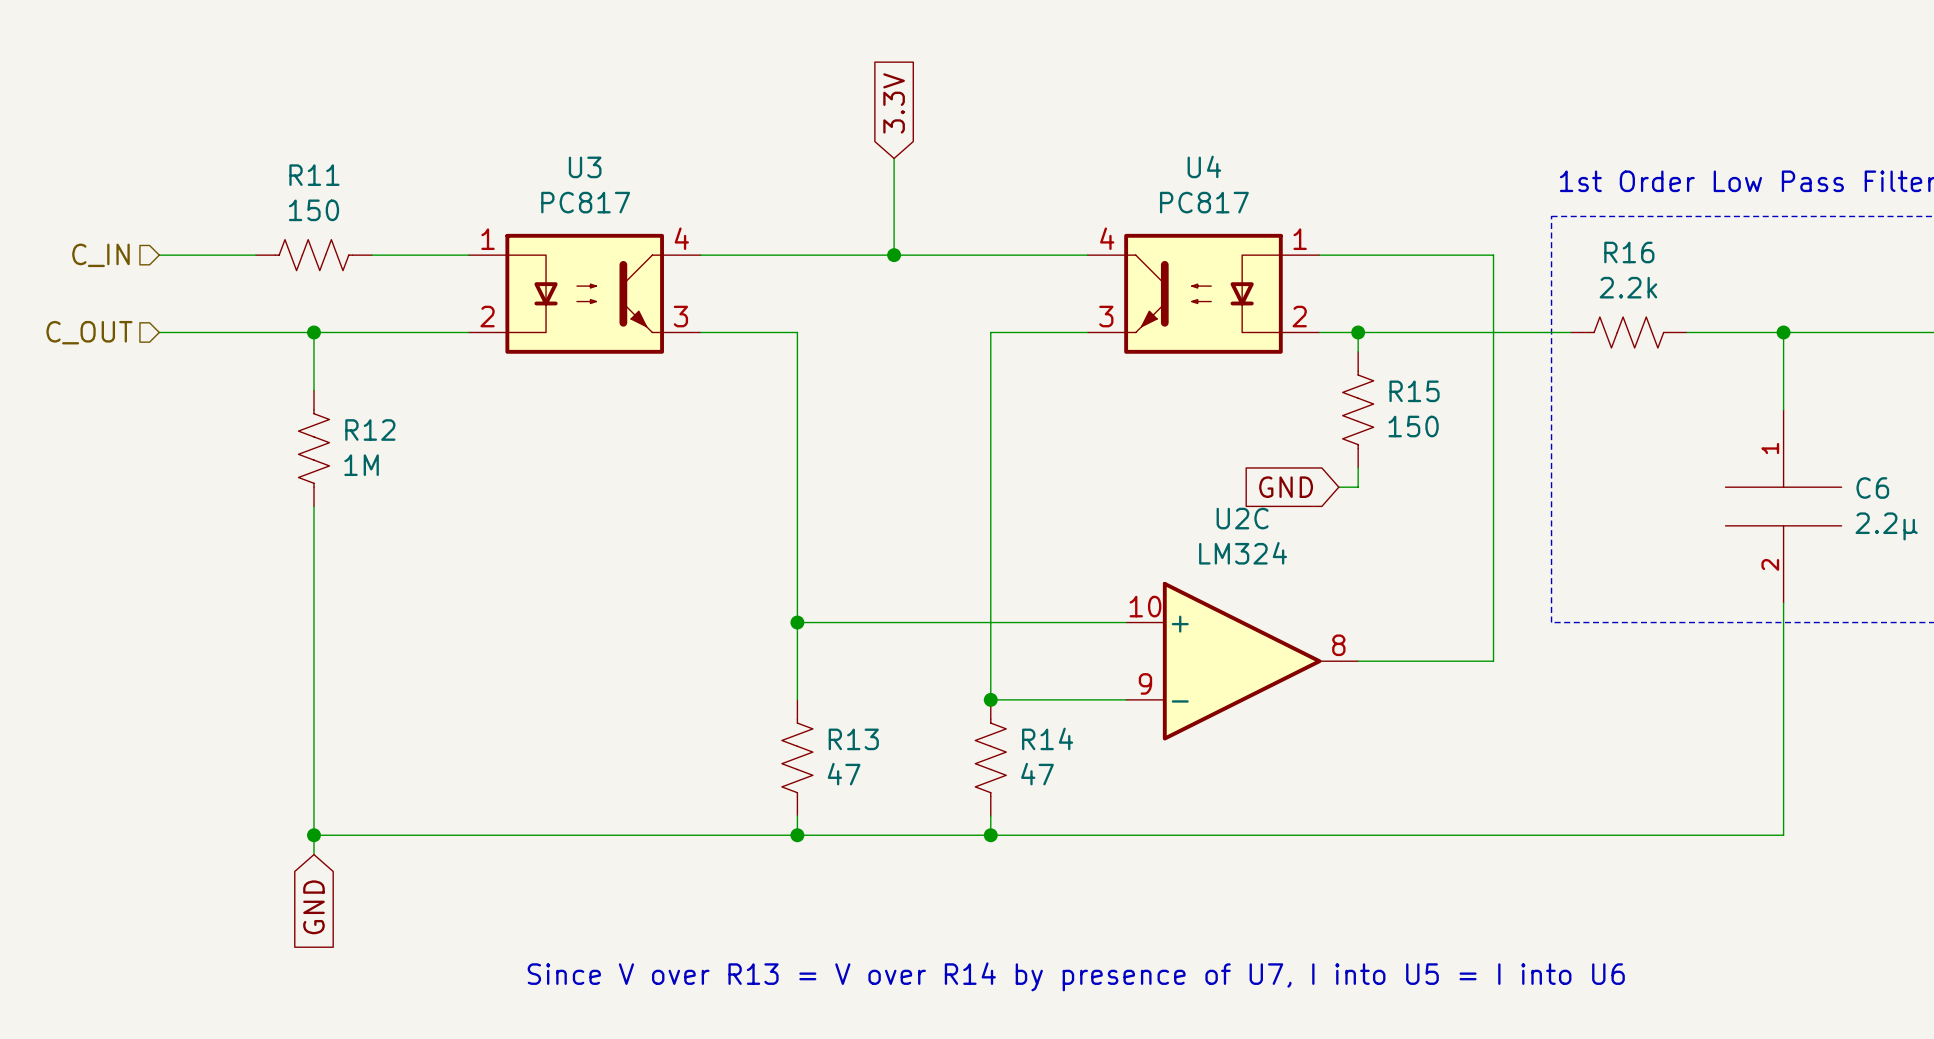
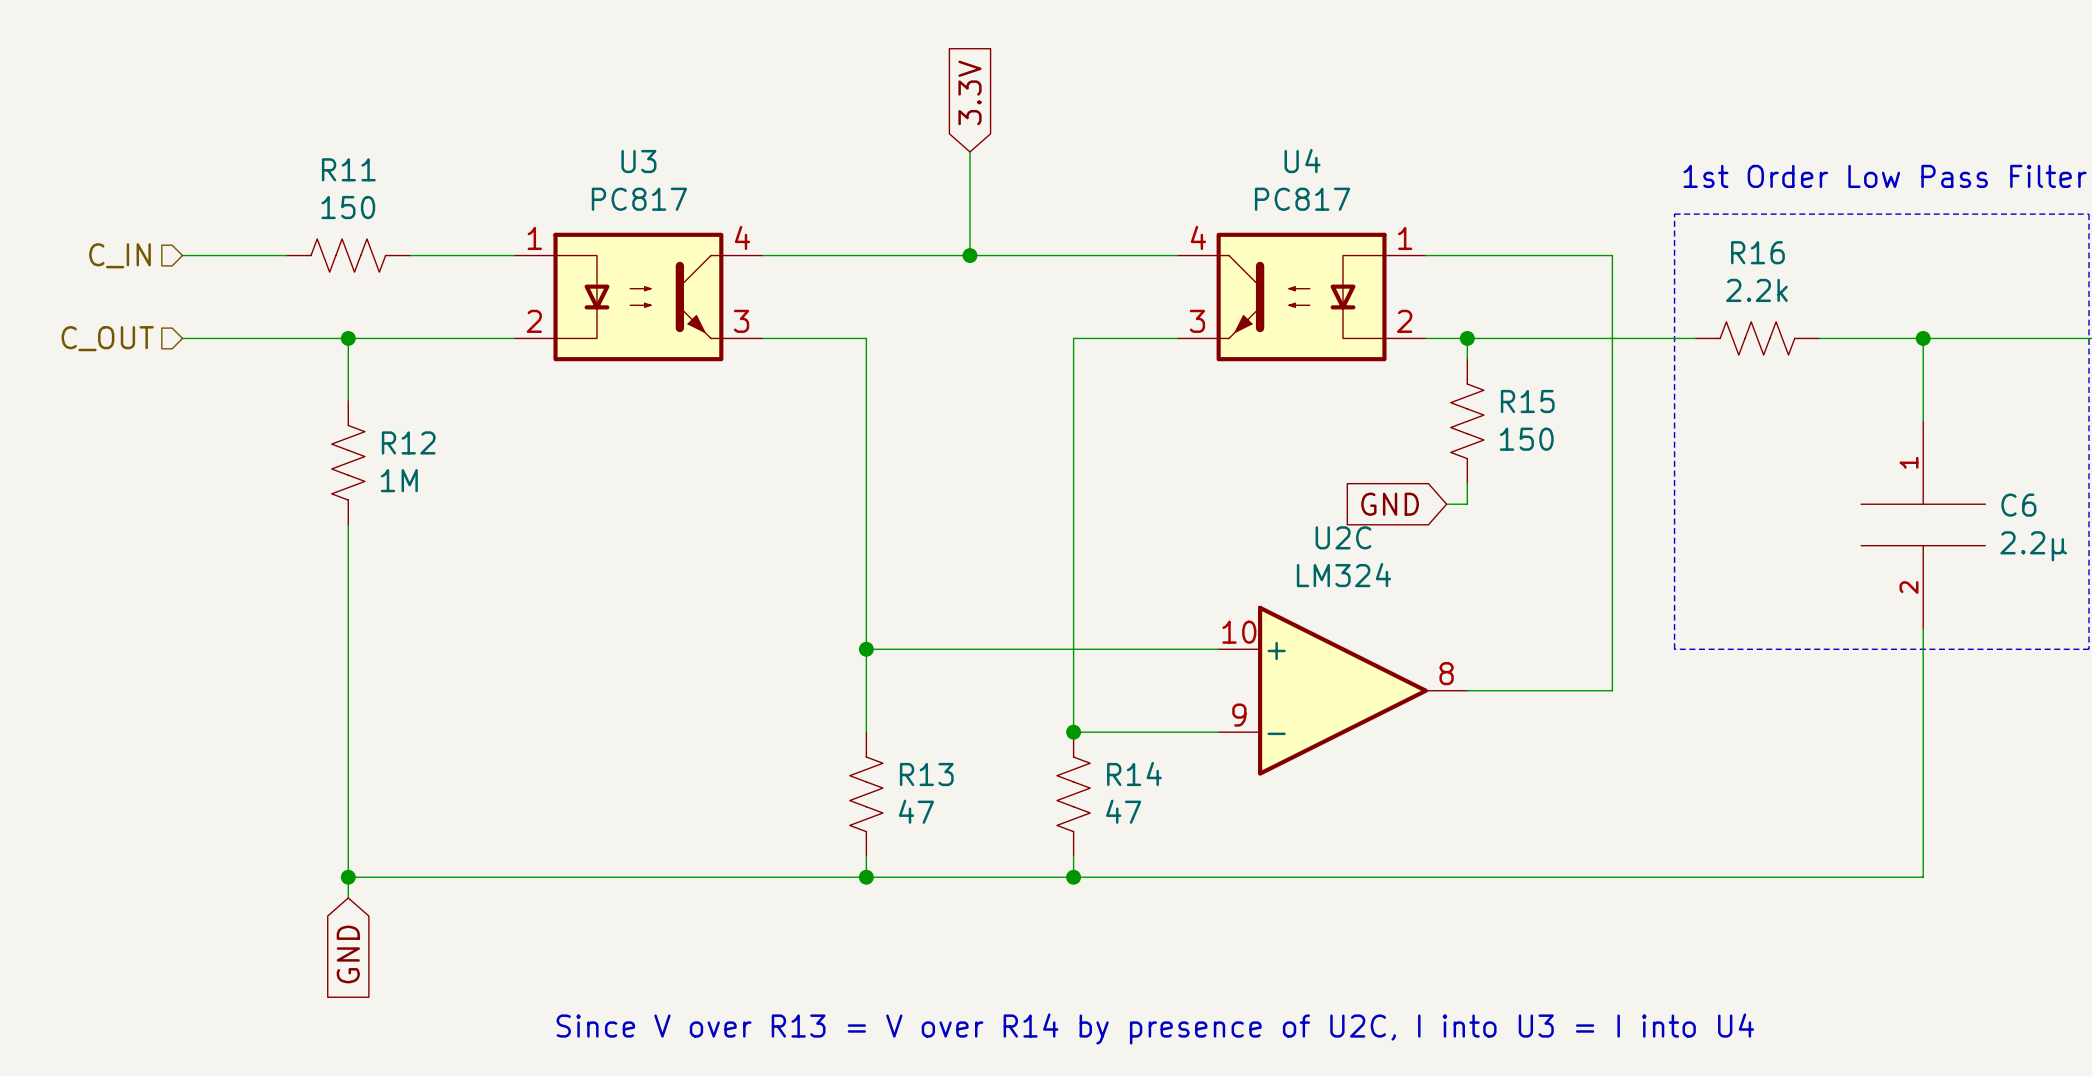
text: Since V over R13 = V over R14 by presence of U7, I into U5 = I into U6 (1076, 976) -> Since V over R13 = V over R14 by presence of U2C, I into U3 = I into U4 (1155, 1028)

